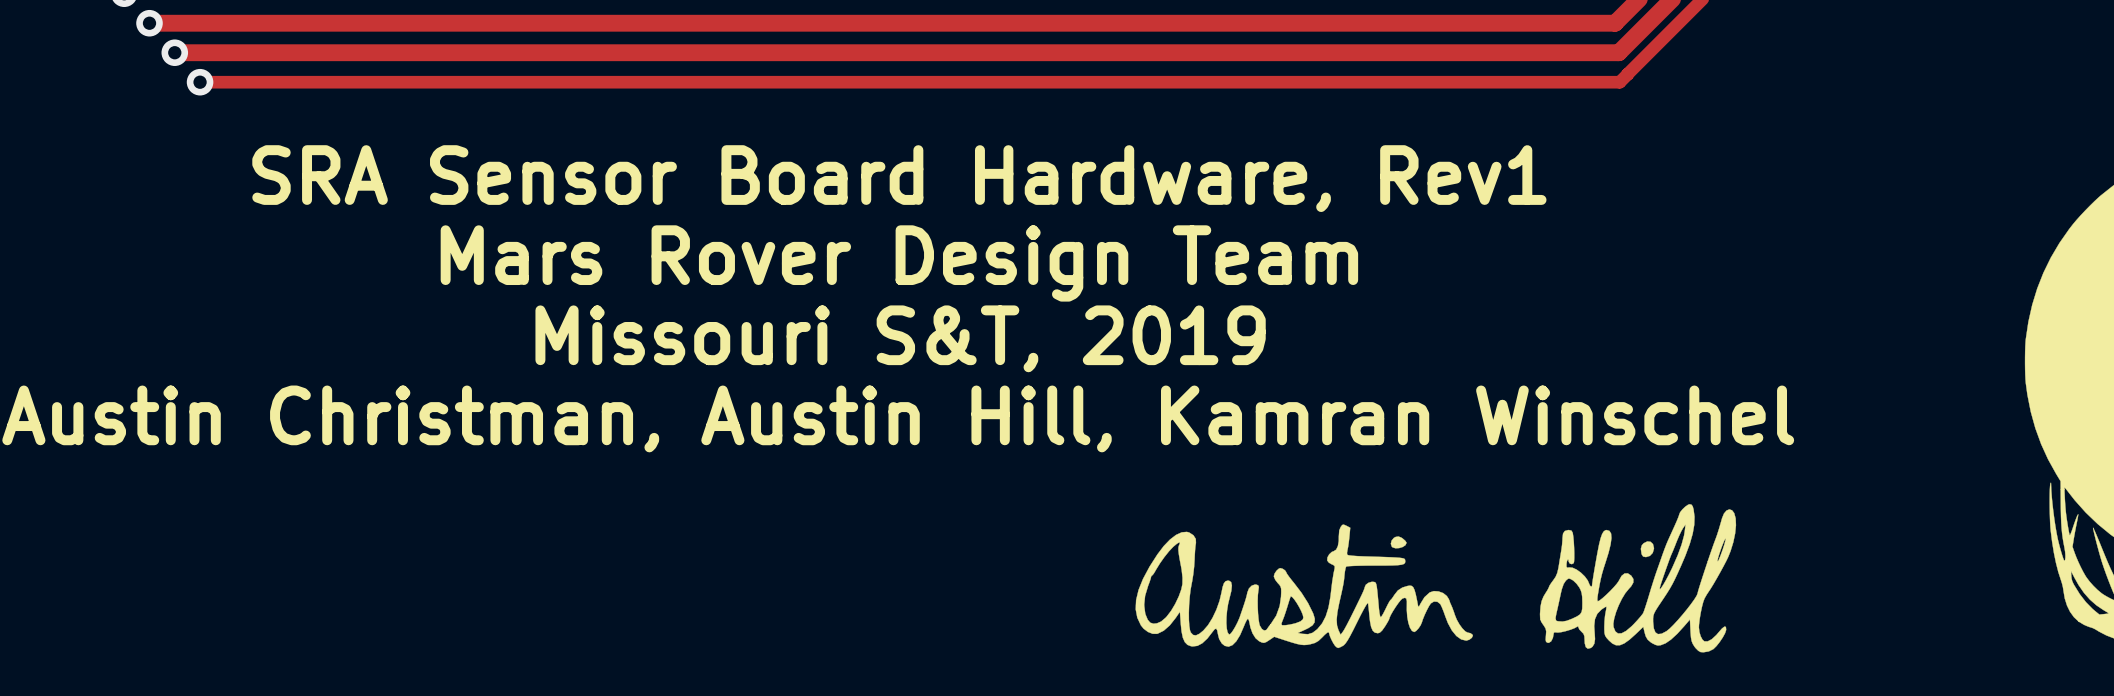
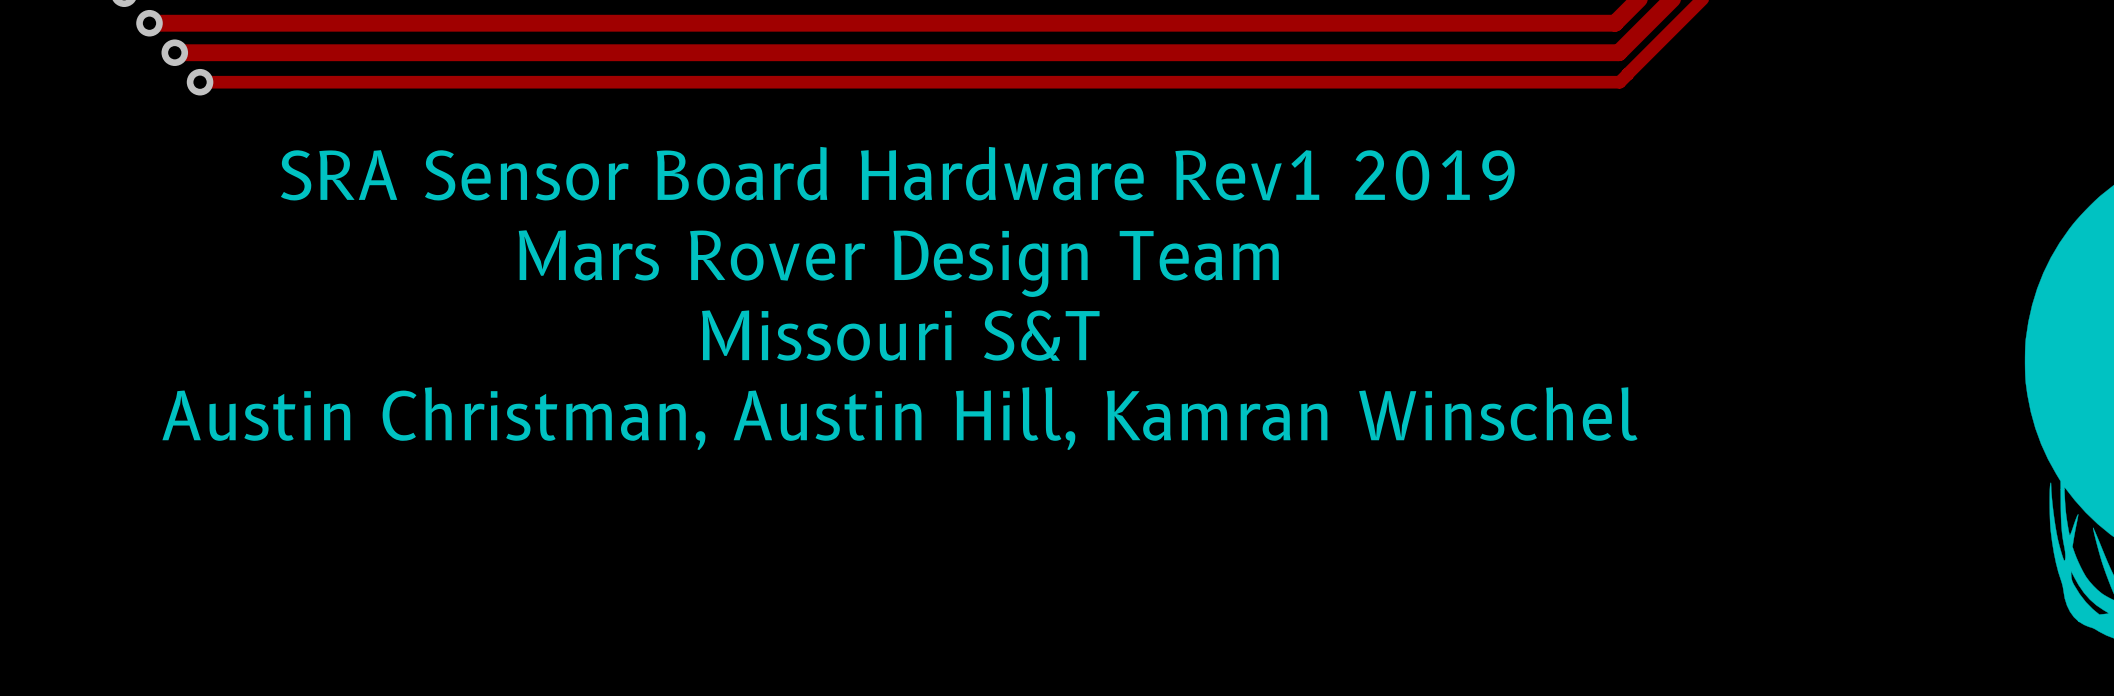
text: SRA Sensor Board Hardware, Rev1 (899, 178) -> SRA Sensor Board Hardware Rev1 2019 (897, 173)
text: Missouri S&T, 2019 (900, 338) -> Missouri S&T (900, 335)
drawing: [1135, 504, 1737, 653] -> none

